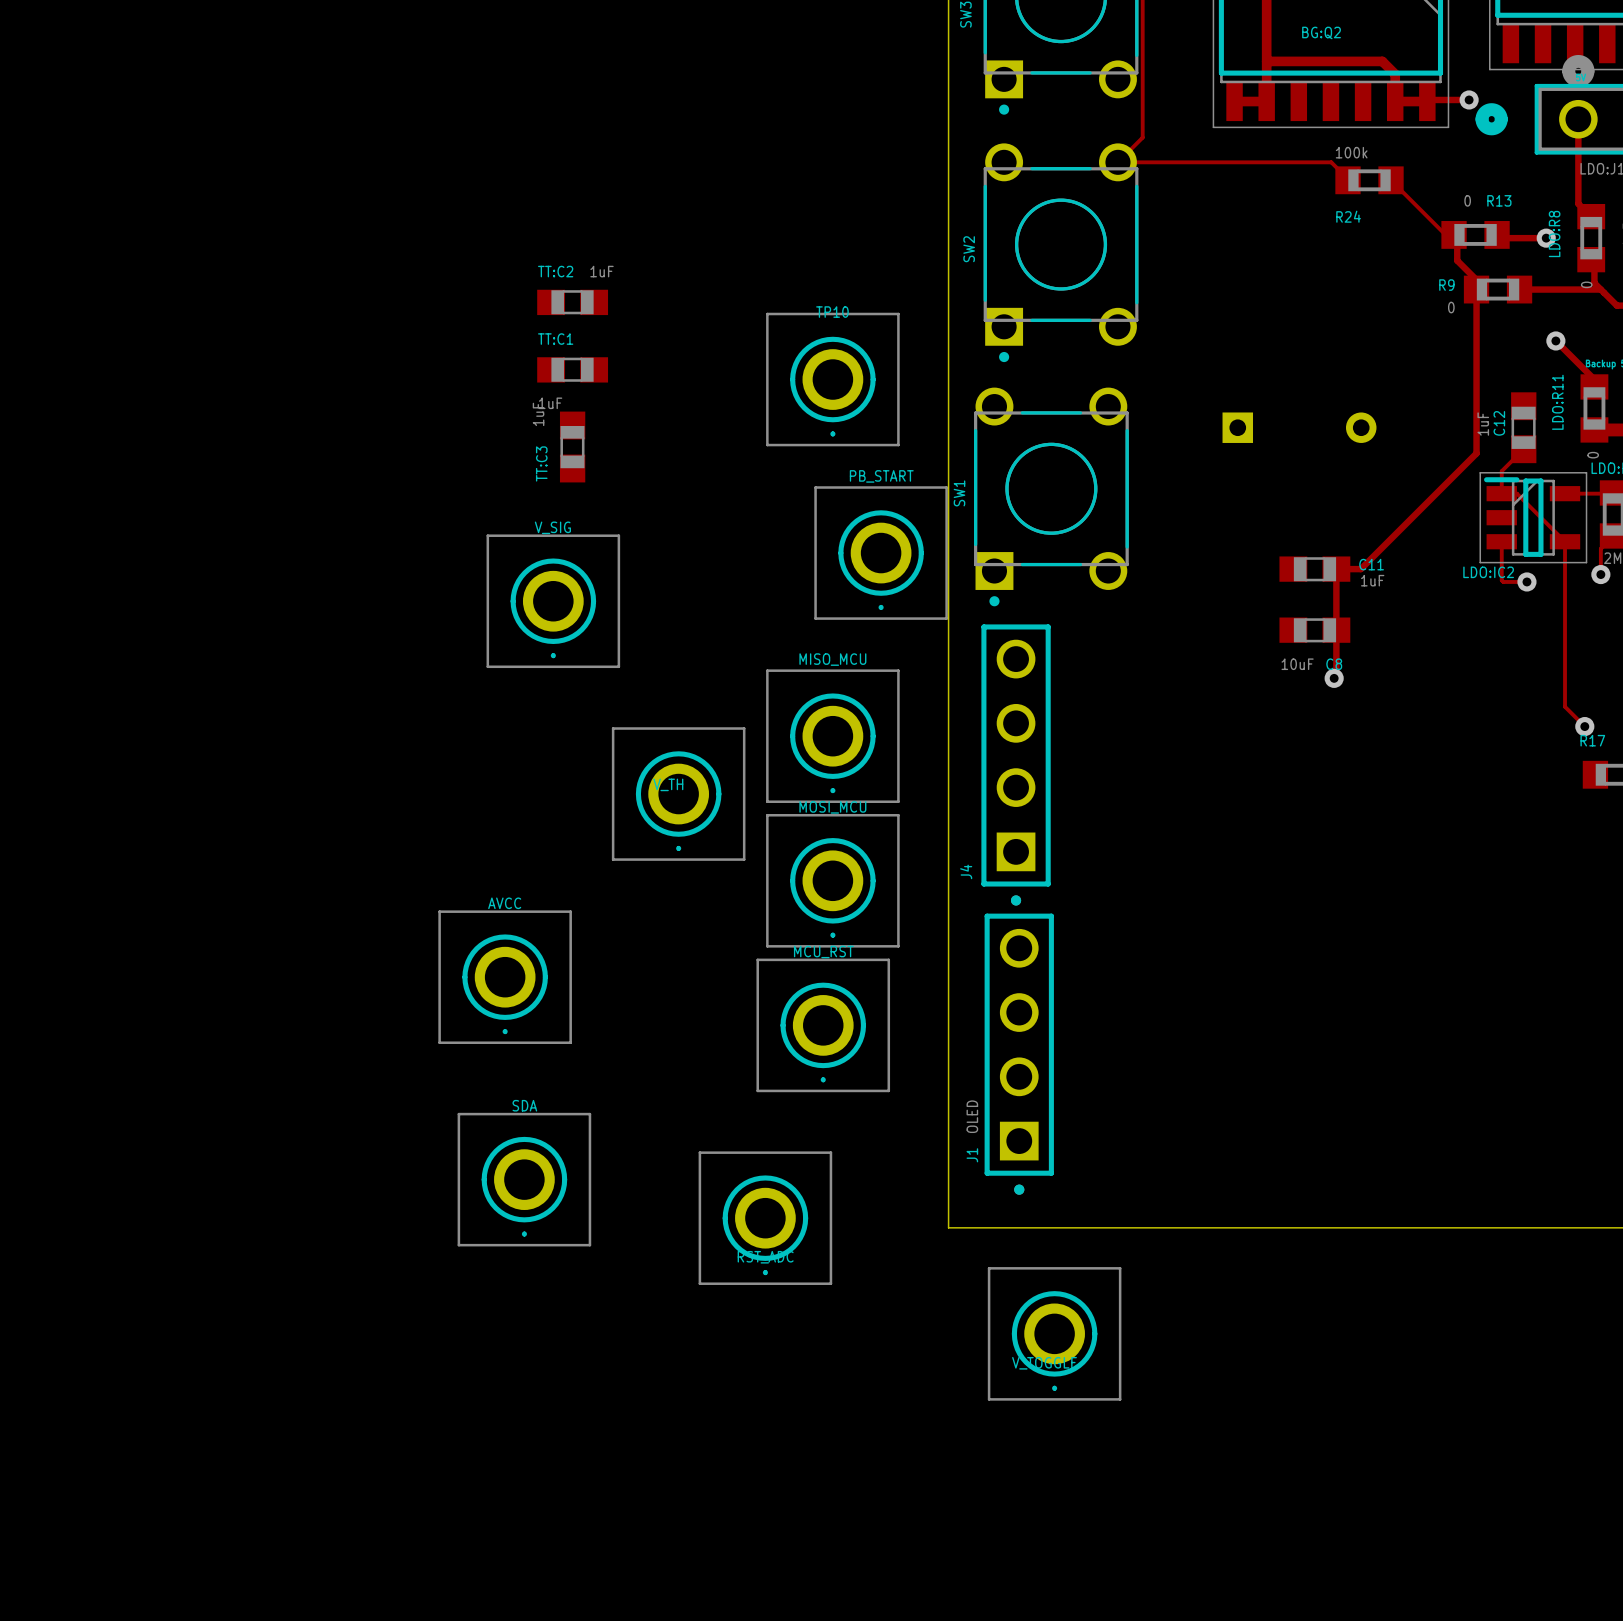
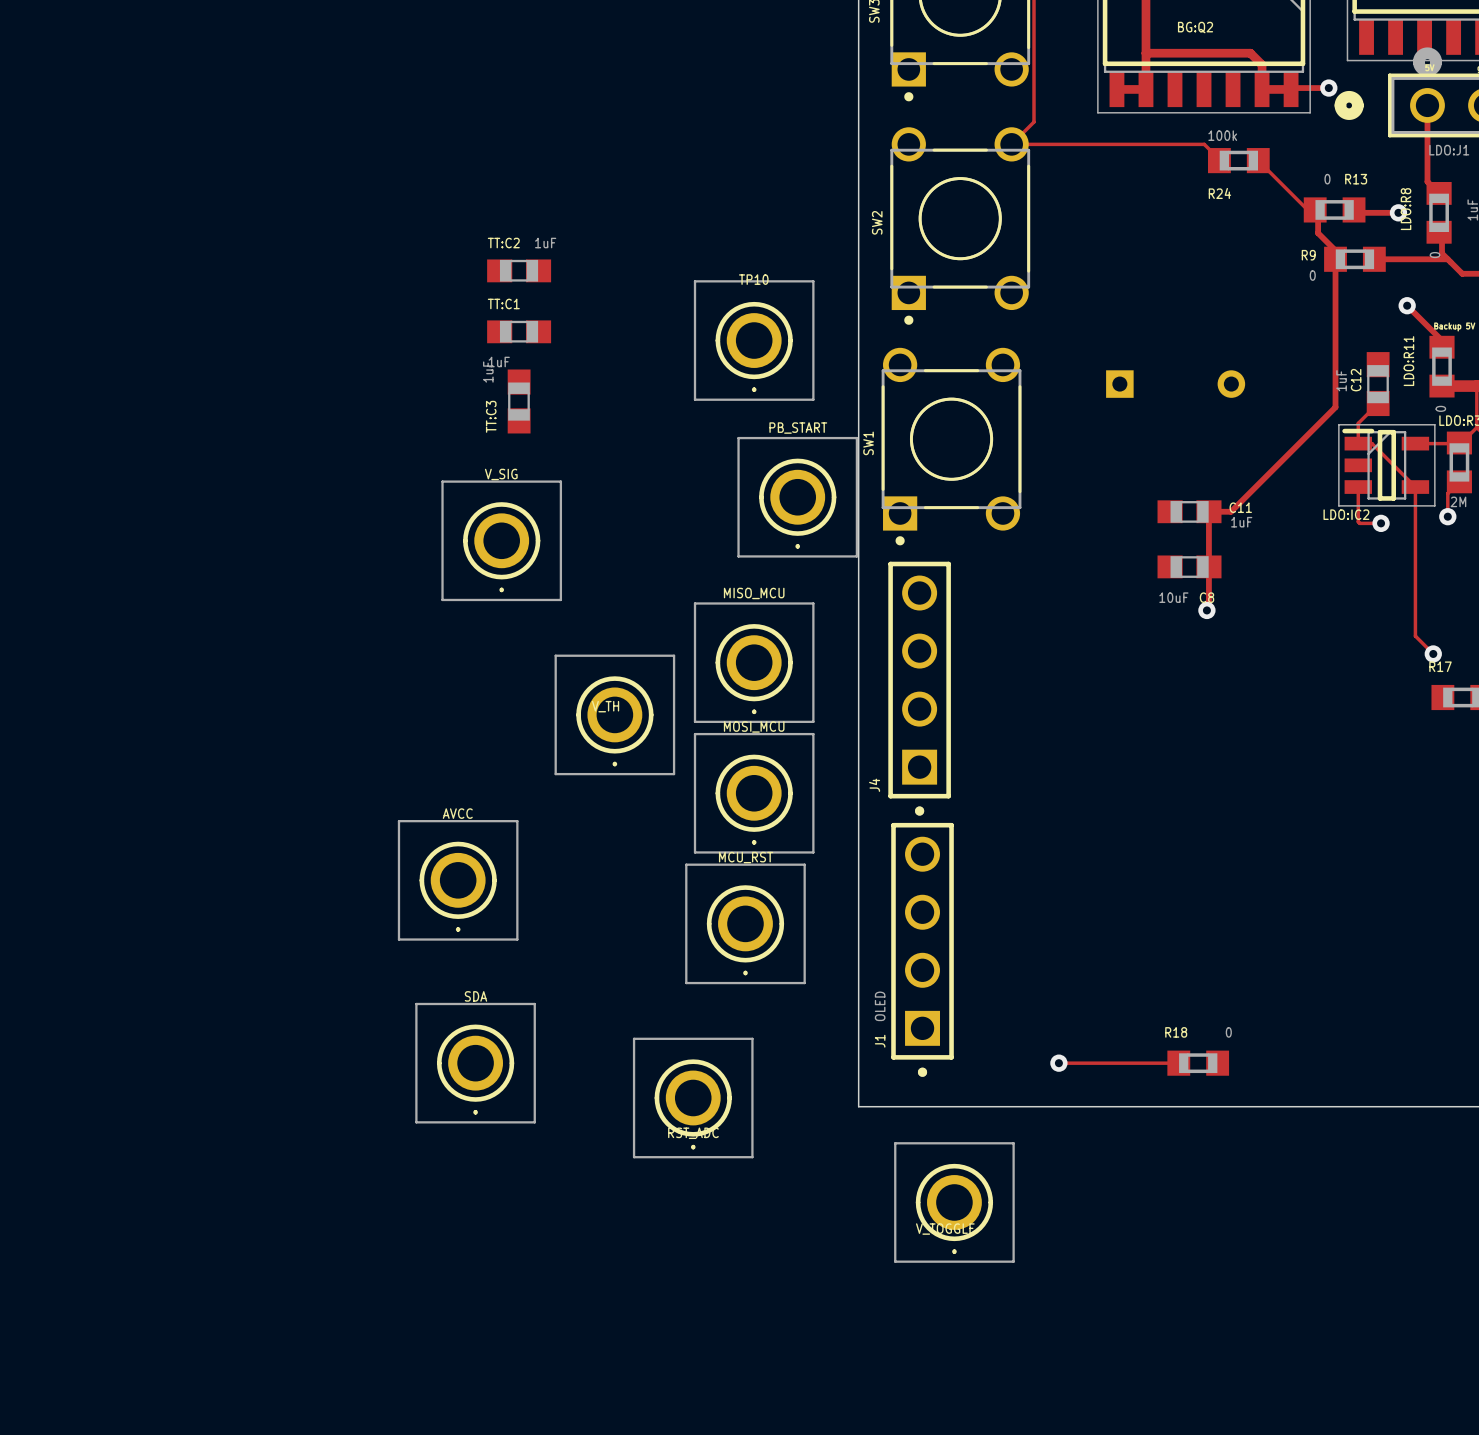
track: none -> (1058, 1063) (1178, 1063)
via: none -> (1058, 1063)
R18: none -> 0 (1198, 1063)

